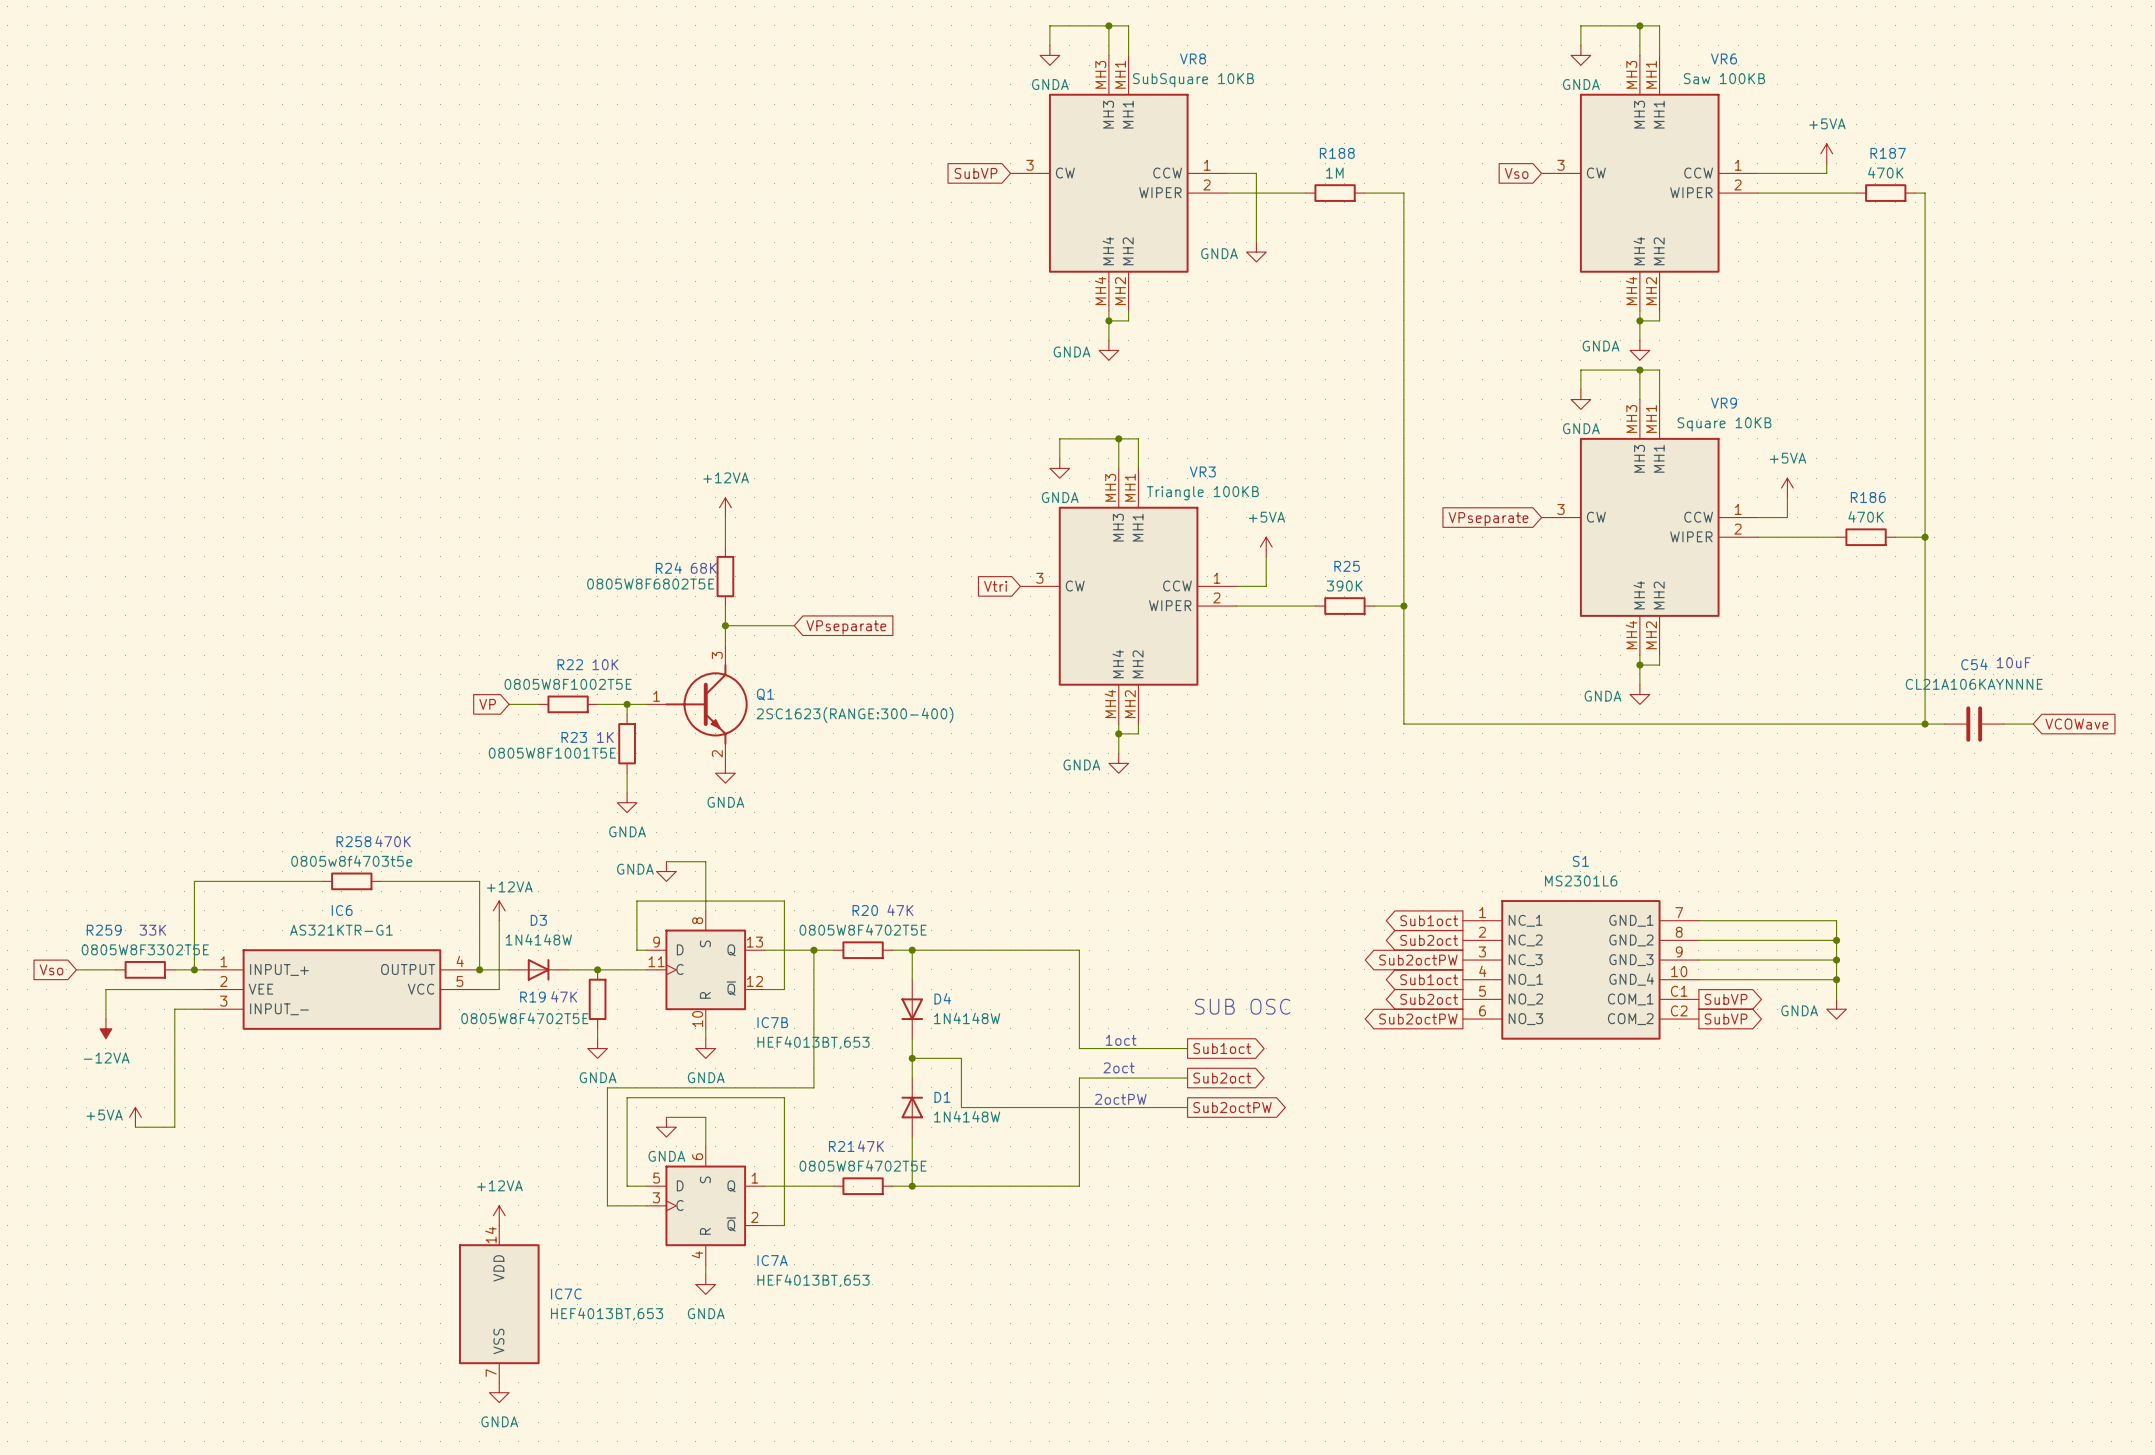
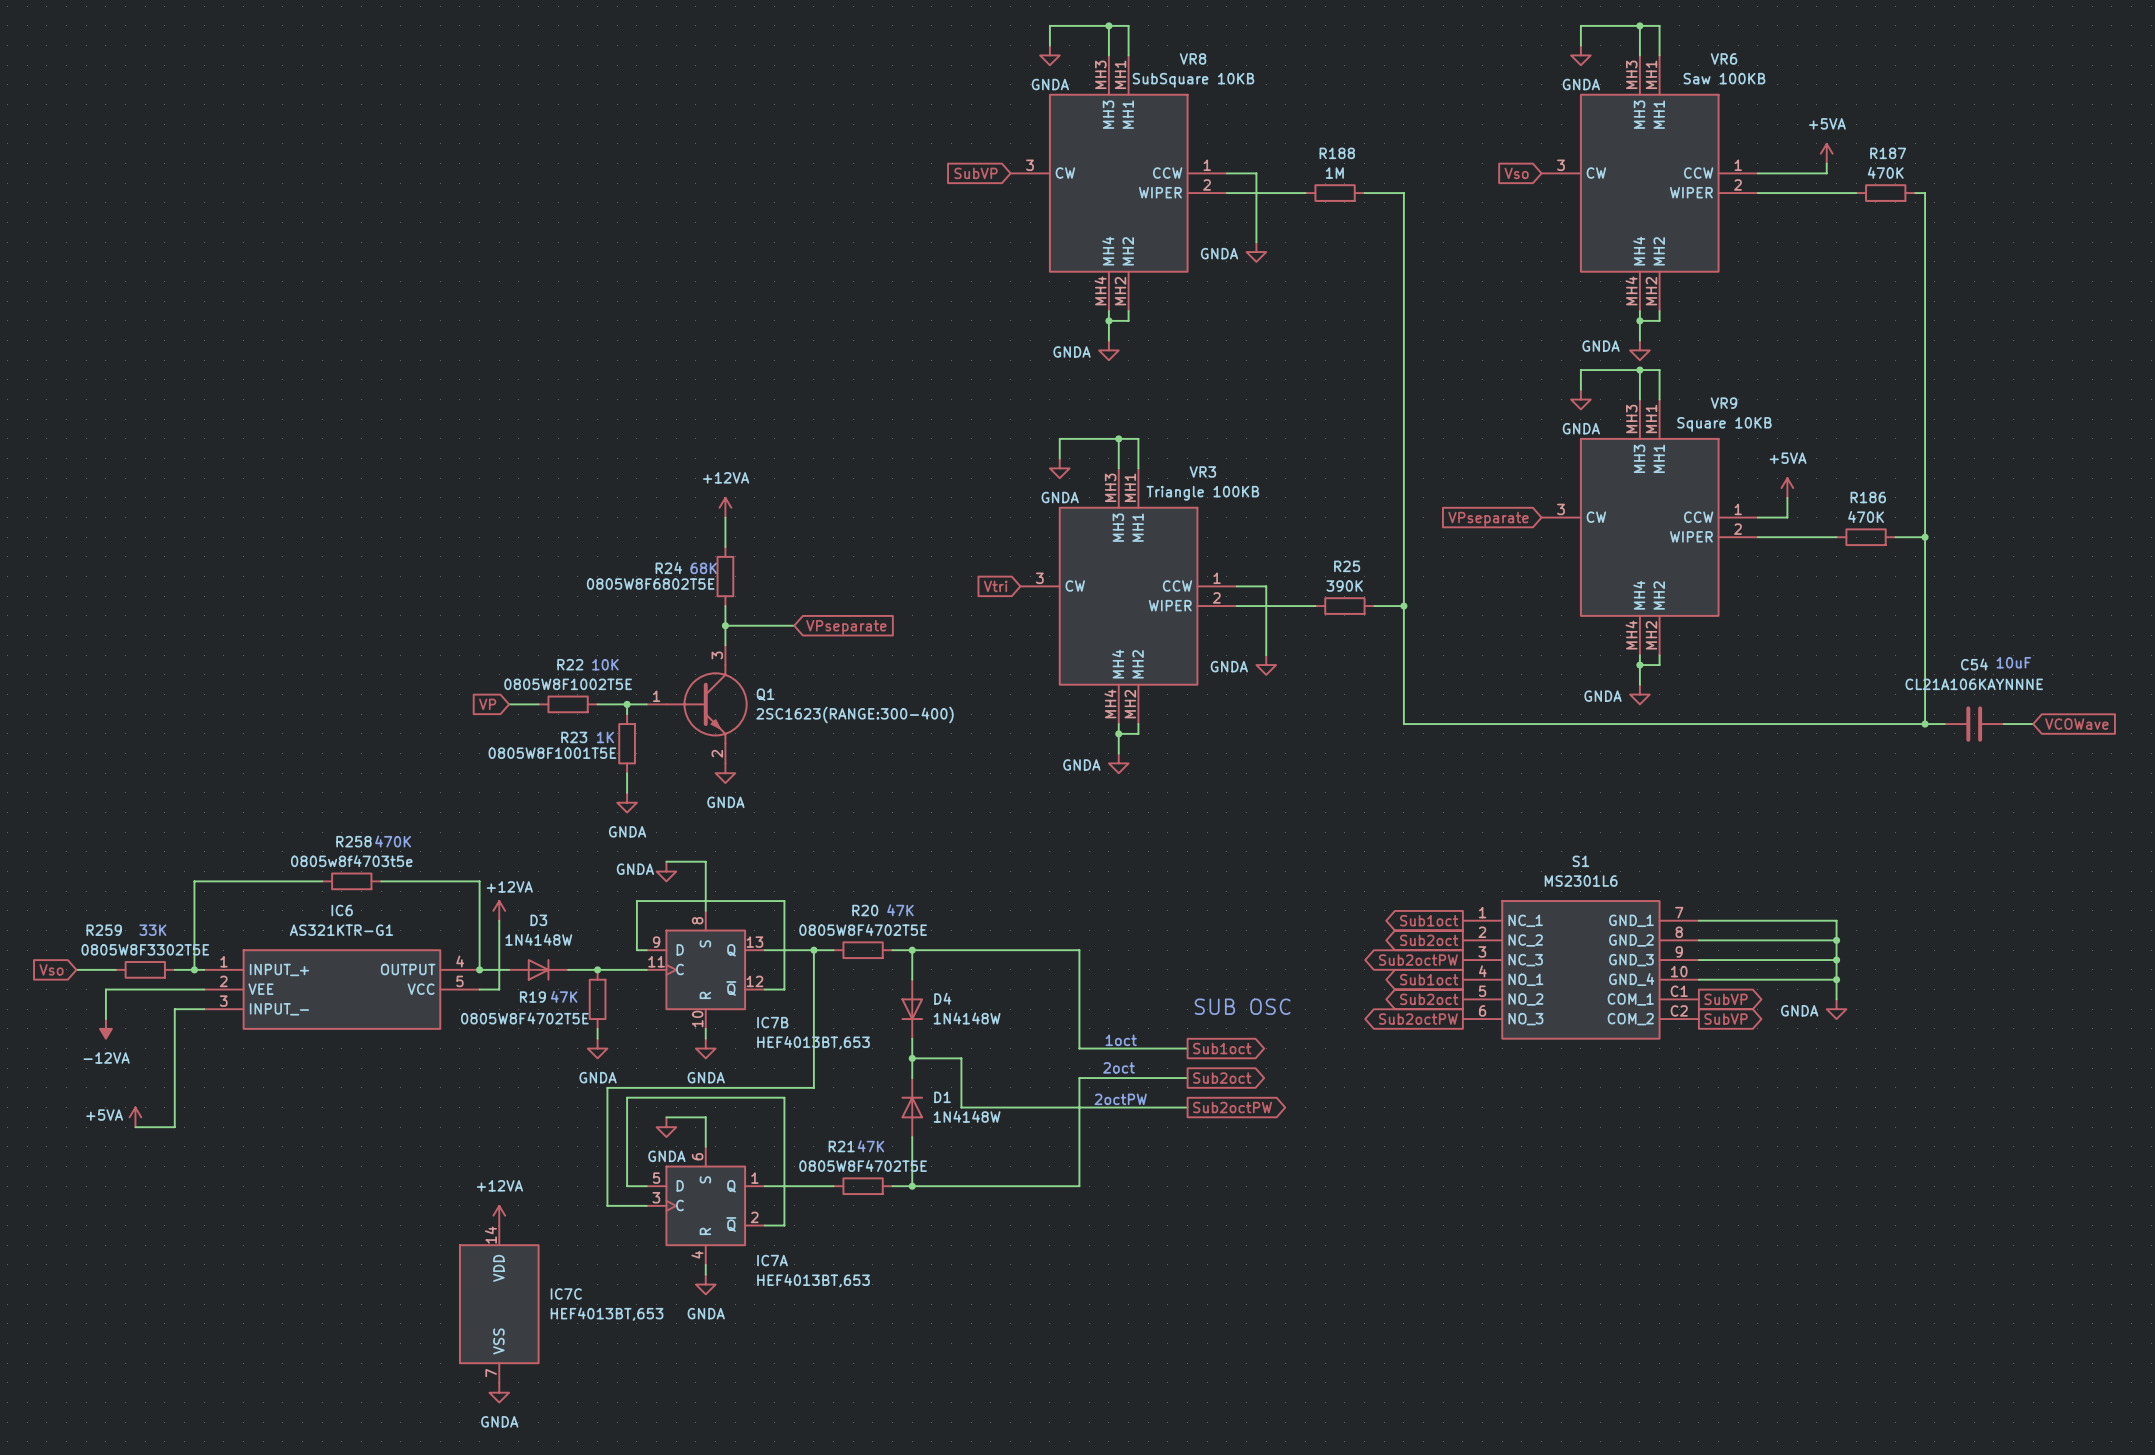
power symbol: +5VA (1266, 547) -> none
wire: (1266, 556) (1266, 586) -> (1266, 655) (1266, 586)
power symbol: none -> GNDA (1266, 665)

